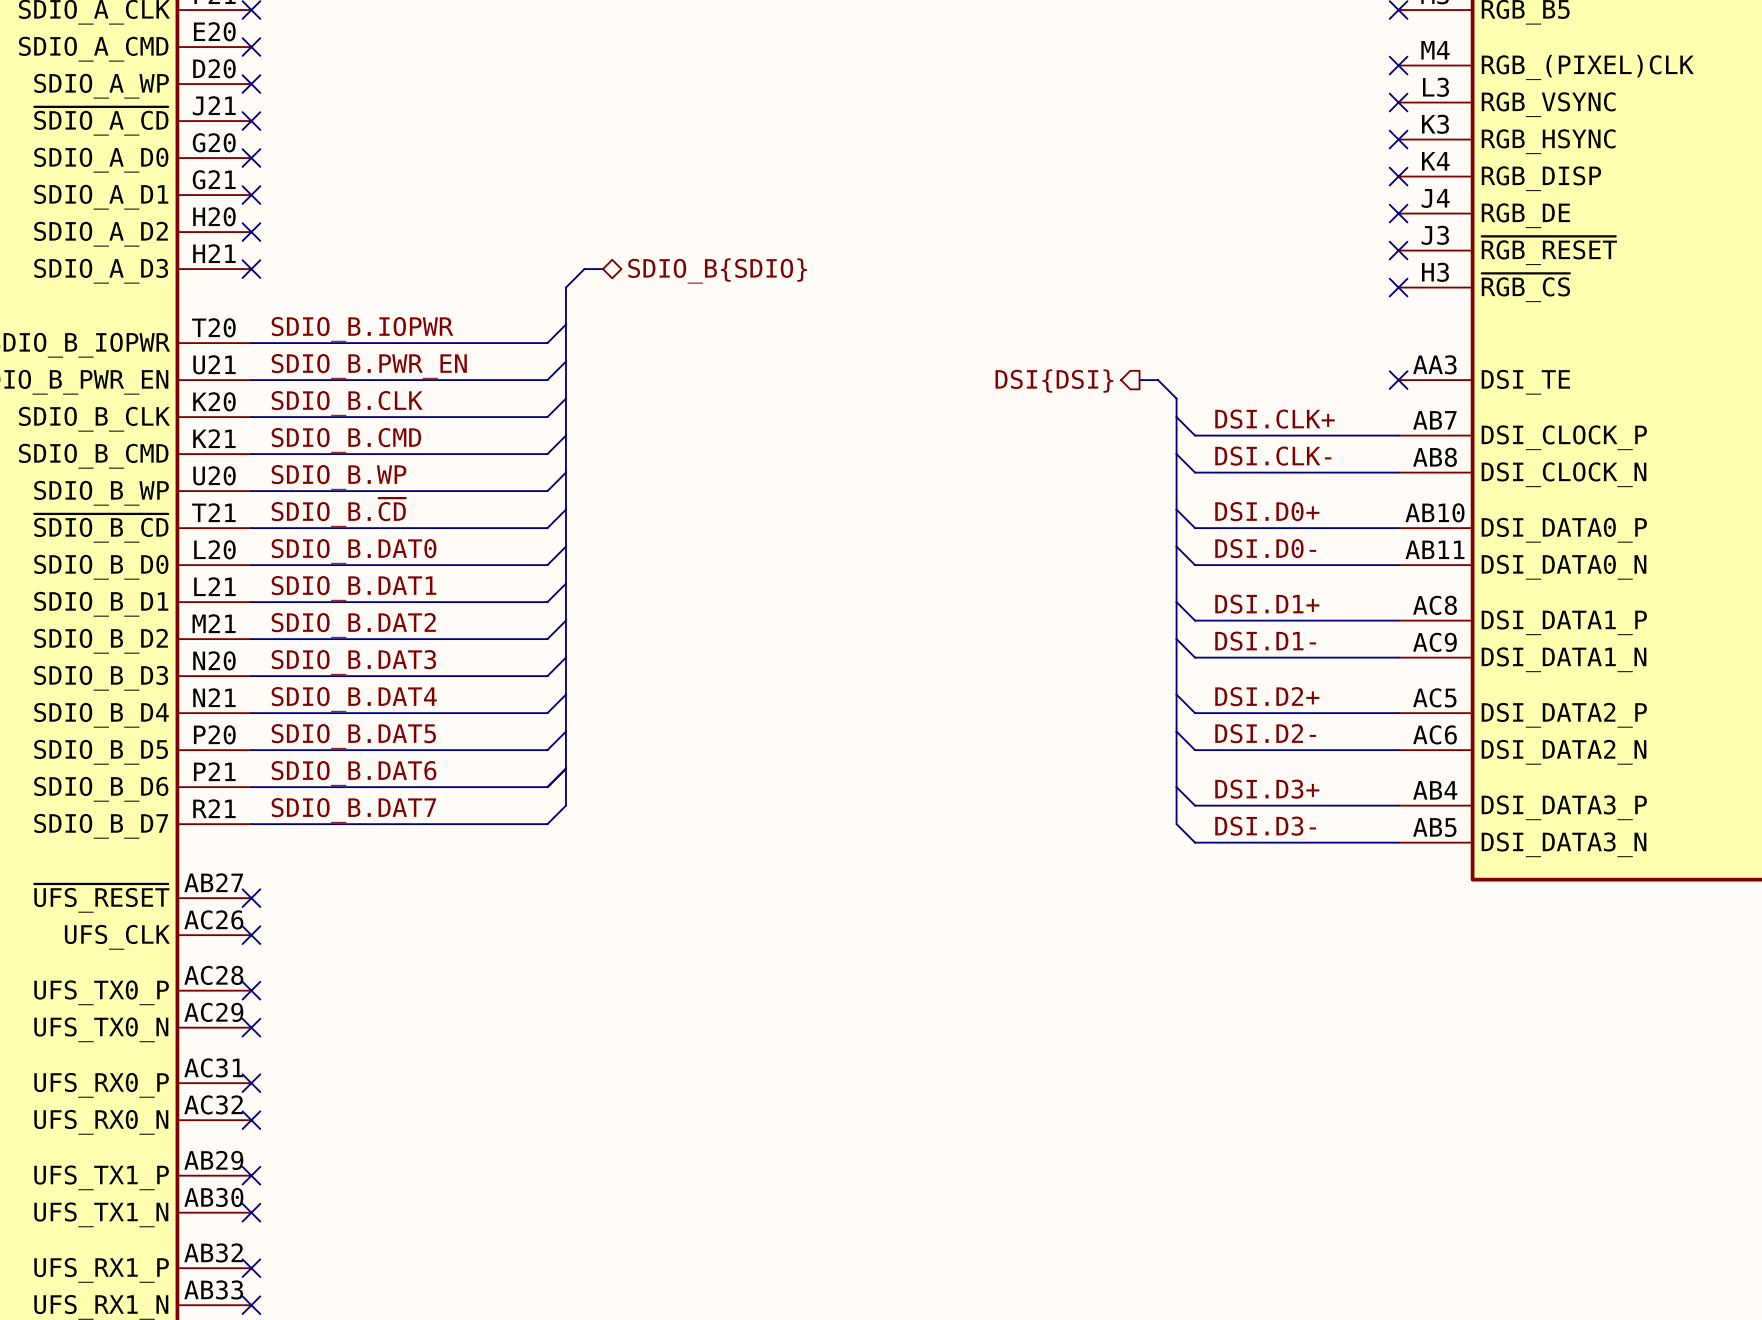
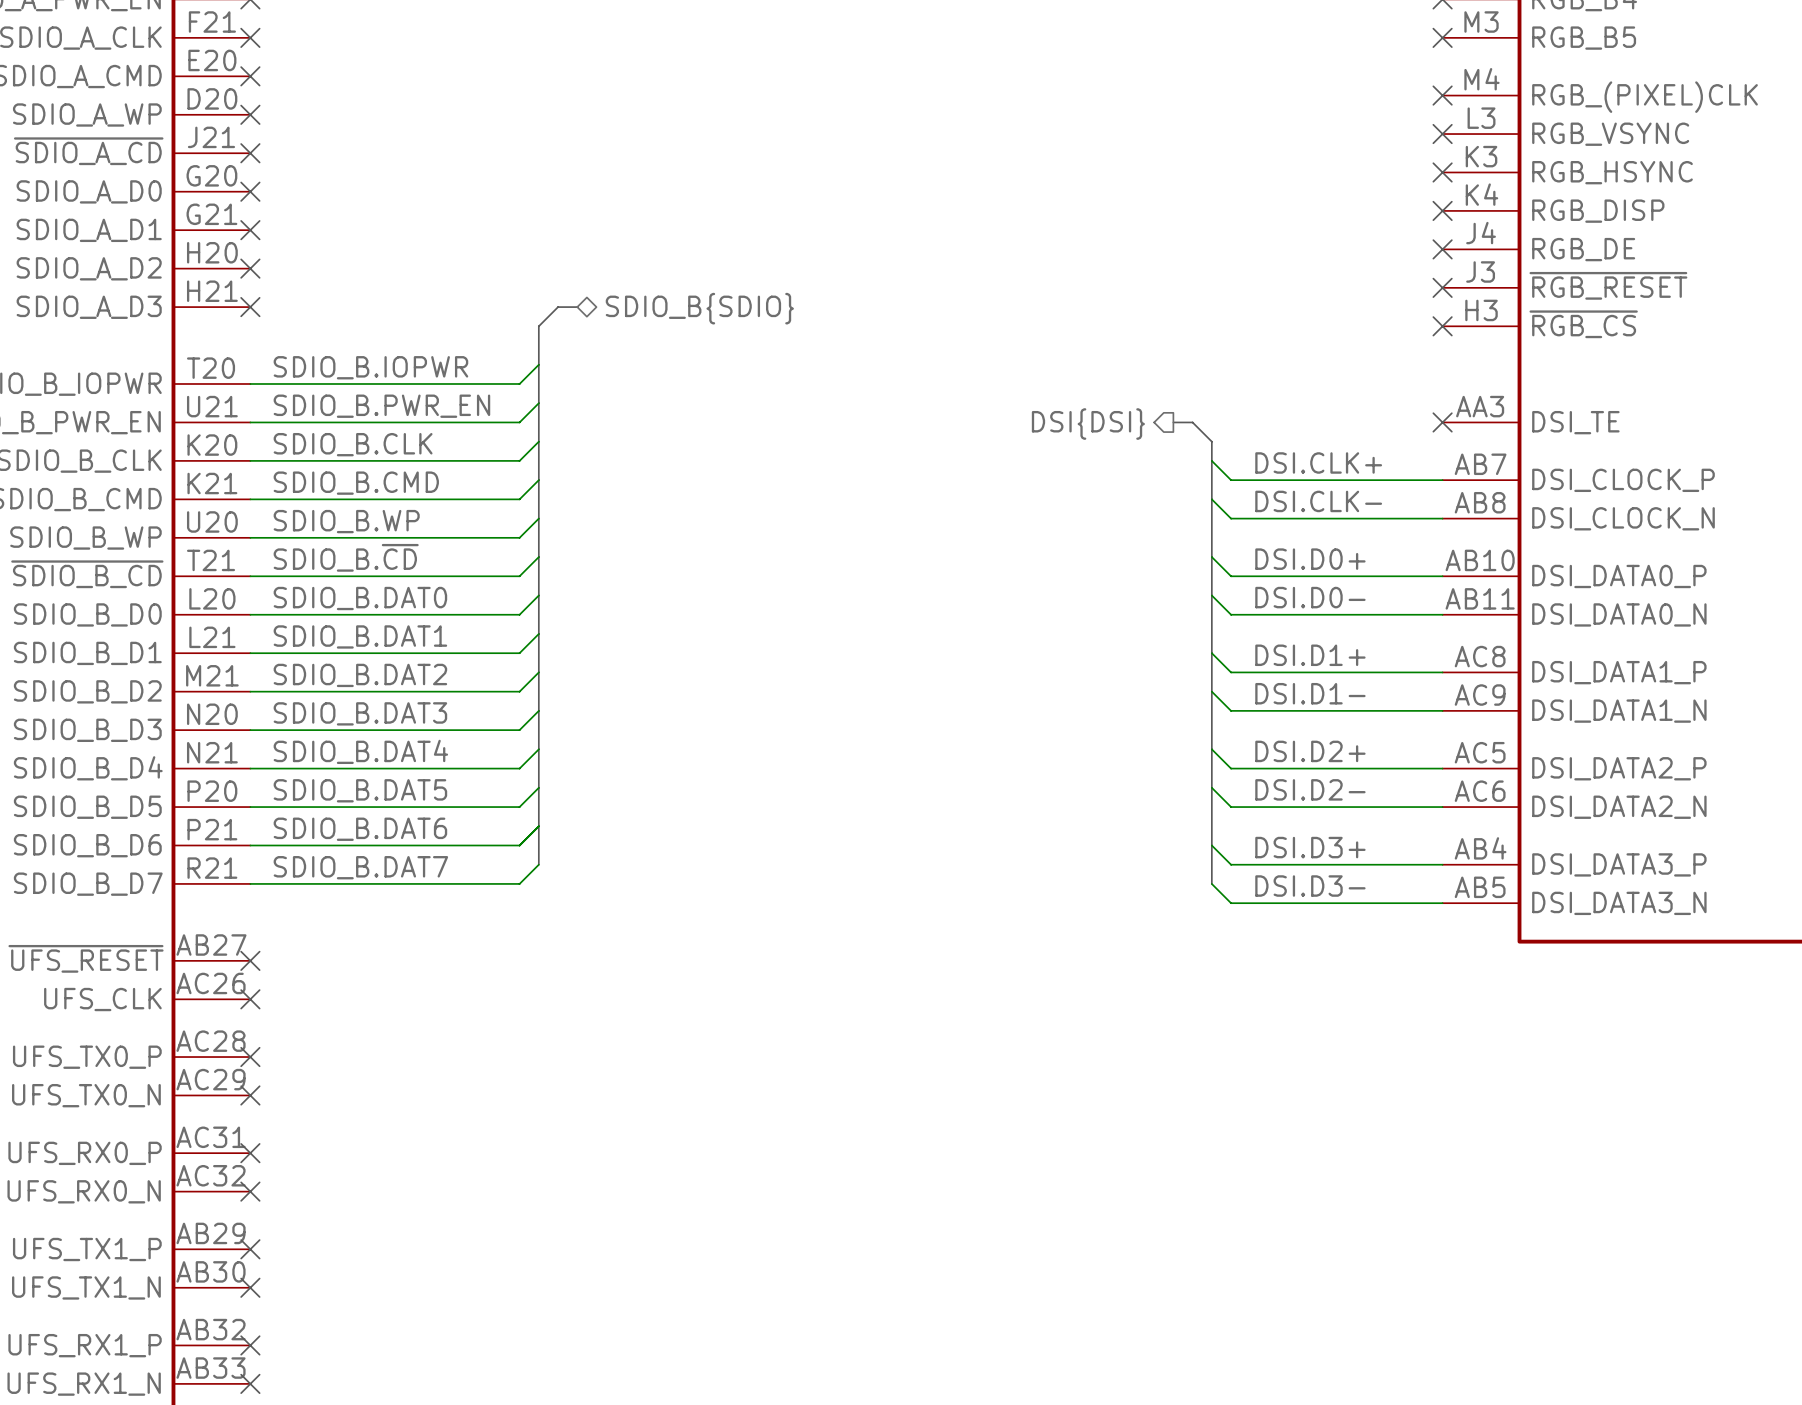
bus: (602, 269) (584, 269) (565, 287) (565, 805) -> (577, 307) (558, 307) (538, 326) (538, 864)
hierarchical label position: SDIO_B{SDIO} (717, 270) -> SDIO_B{SDIO} (699, 308)
wire: (565, 324) (547, 343) (510, 343) -> (538, 364) (519, 383)
wire: (565, 361) (547, 380) (510, 380) -> (538, 403) (519, 422)
wire: (565, 398) (547, 417) (510, 417) -> (538, 441) (519, 460)
wire: (565, 435) (547, 454) (510, 454) -> (538, 480) (519, 499)
wire: (565, 472) (547, 491) (510, 491) -> (538, 518) (519, 537)
wire: (565, 509) (547, 528) (510, 528) -> (538, 557) (519, 576)
wire: (565, 546) (547, 565) (510, 565) -> (538, 595) (519, 614)
wire: (565, 583) (547, 602) (510, 602) -> (538, 633) (519, 653)
wire: (565, 620) (547, 639) (510, 639) -> (538, 672) (519, 691)
wire: (565, 657) (547, 676) (510, 676) -> (538, 710) (519, 730)
wire: (565, 694) (547, 713) (510, 713) -> (538, 749) (519, 768)
wire: (565, 731) (547, 750) (510, 750) -> (538, 787) (519, 807)
wire: (565, 768) (547, 787) (510, 787) -> (538, 826) (519, 845)
wire: (565, 805) (547, 824) (510, 824) -> (538, 864) (519, 883)

